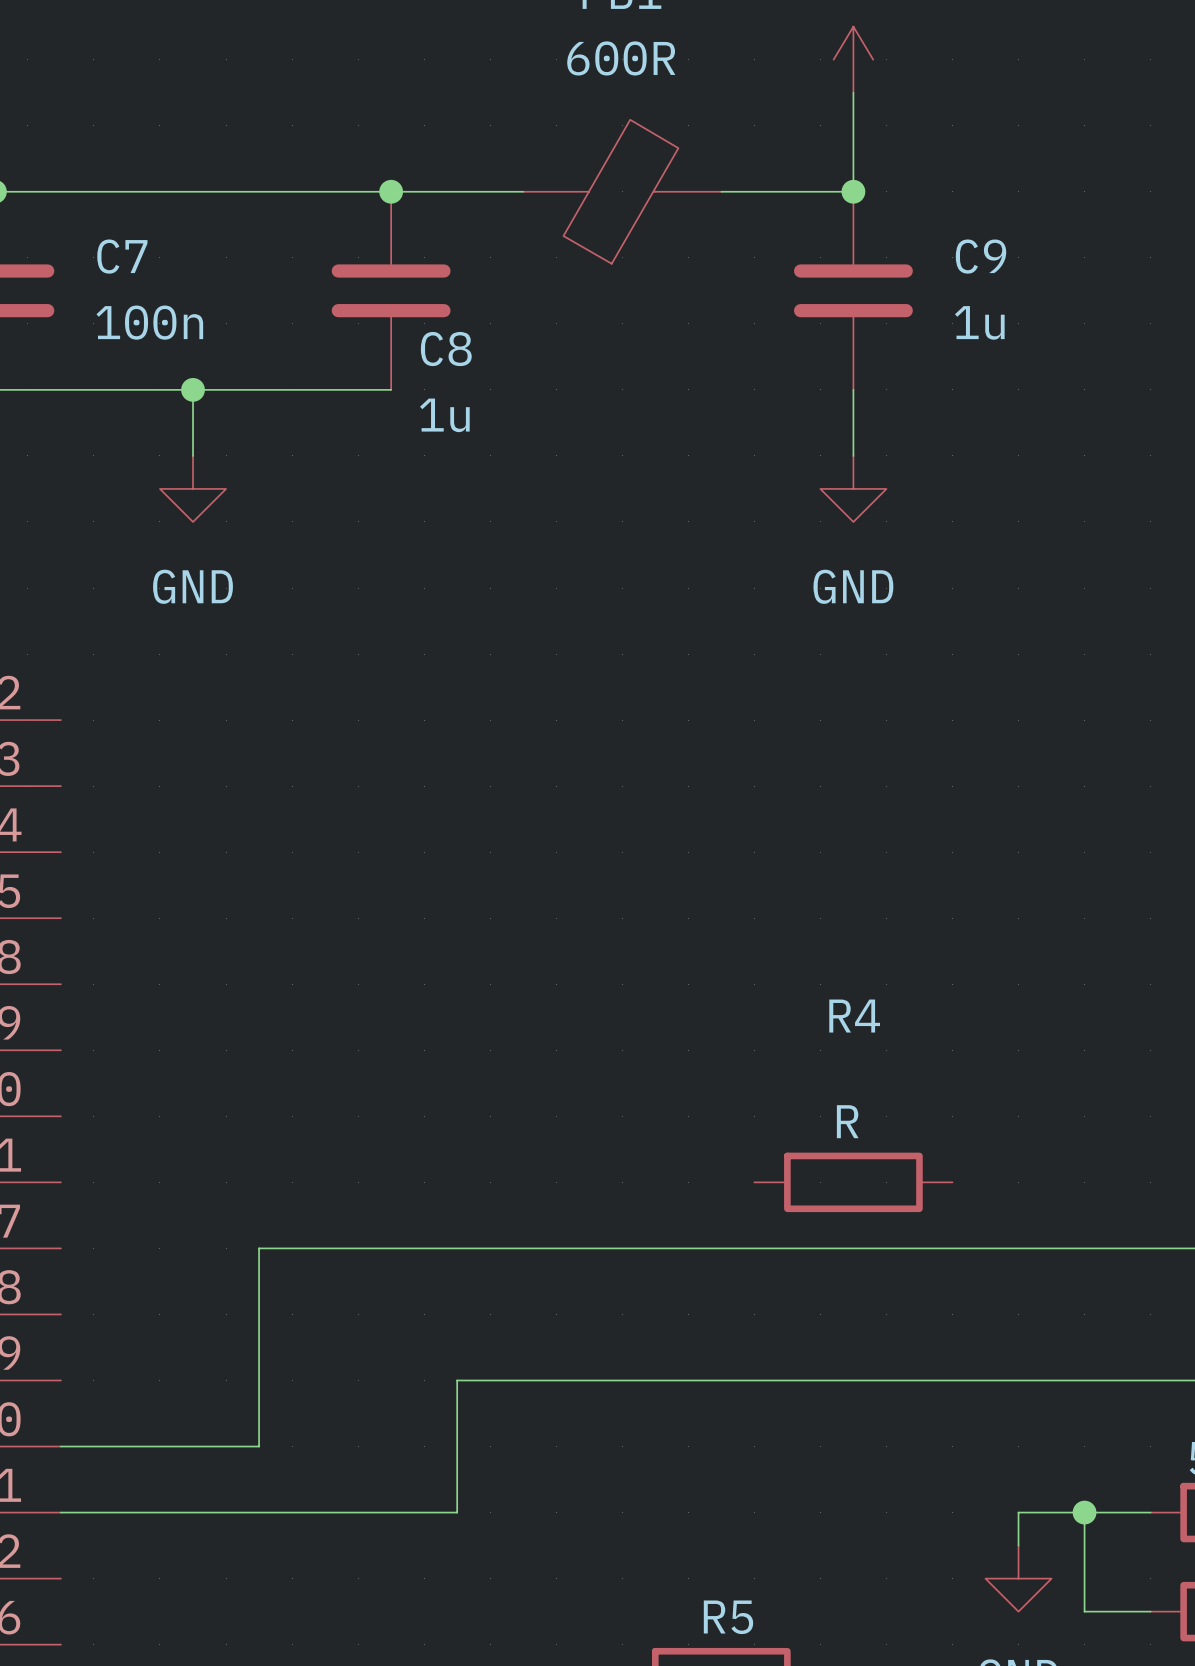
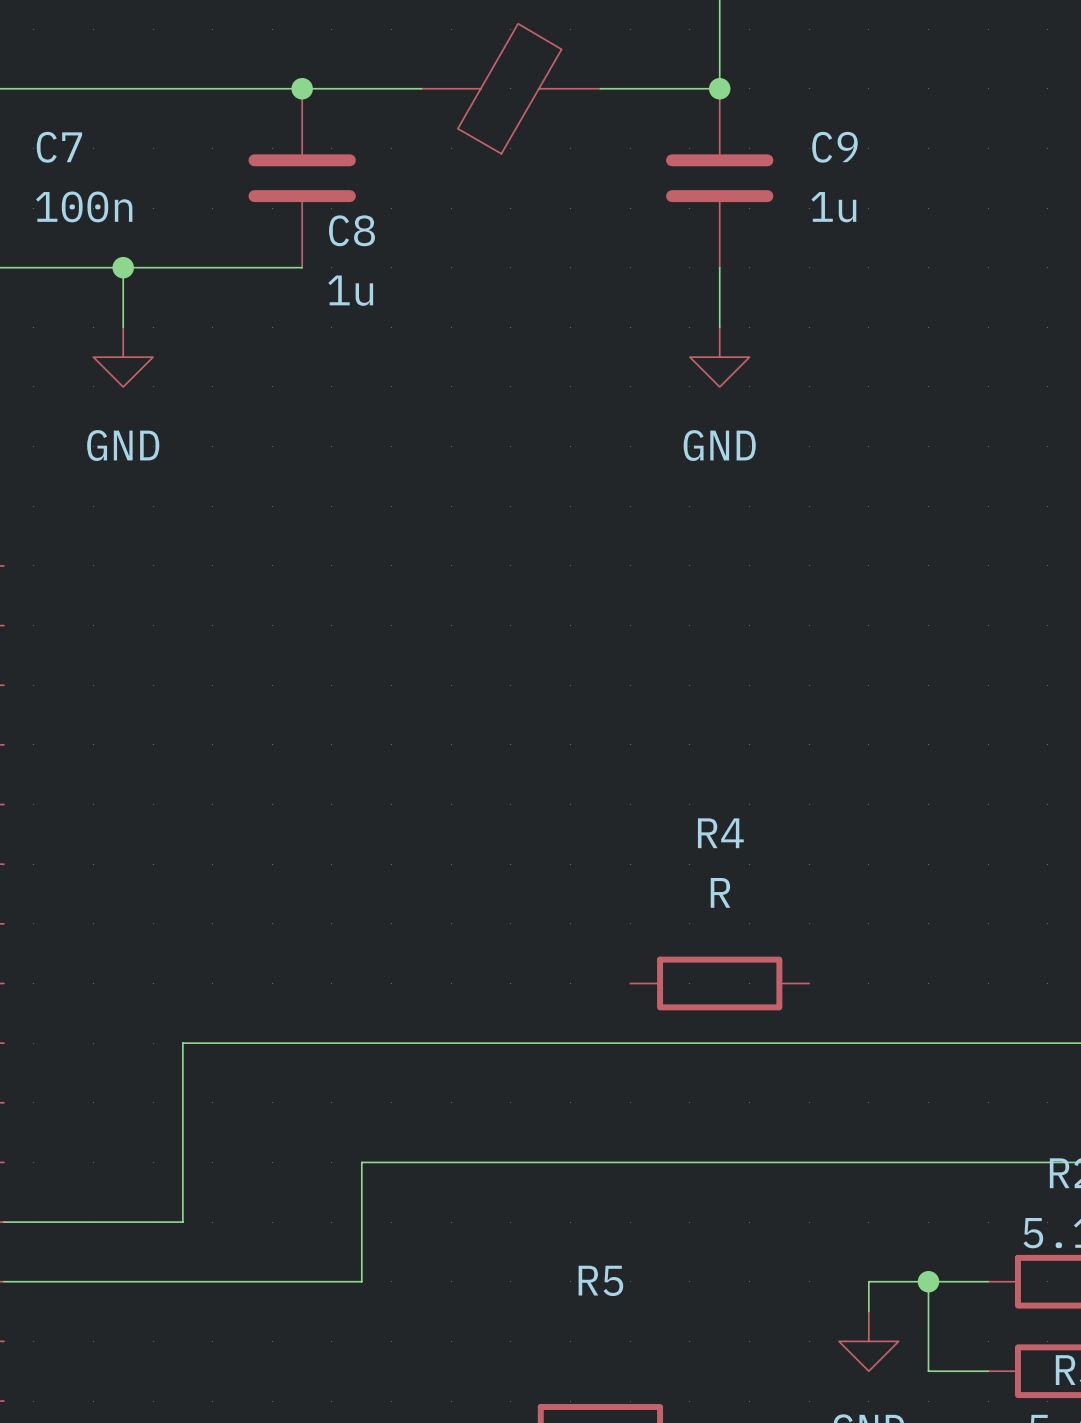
R4 value position: R (847, 1121) -> R (720, 892)
R5 name position: R5 (728, 1617) -> R5 (600, 1280)

